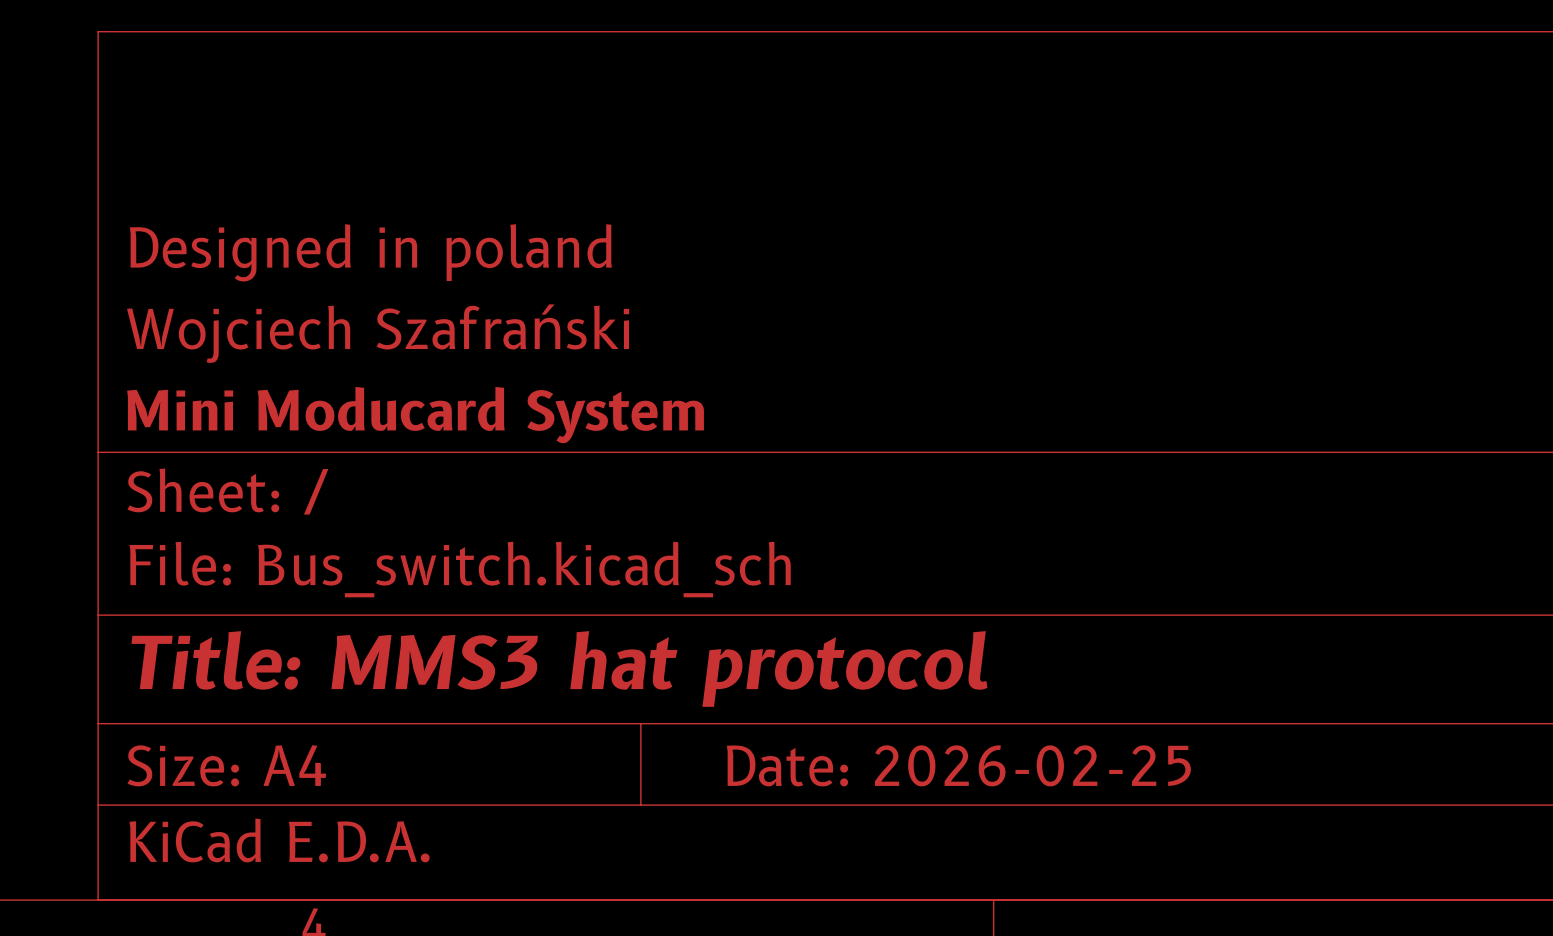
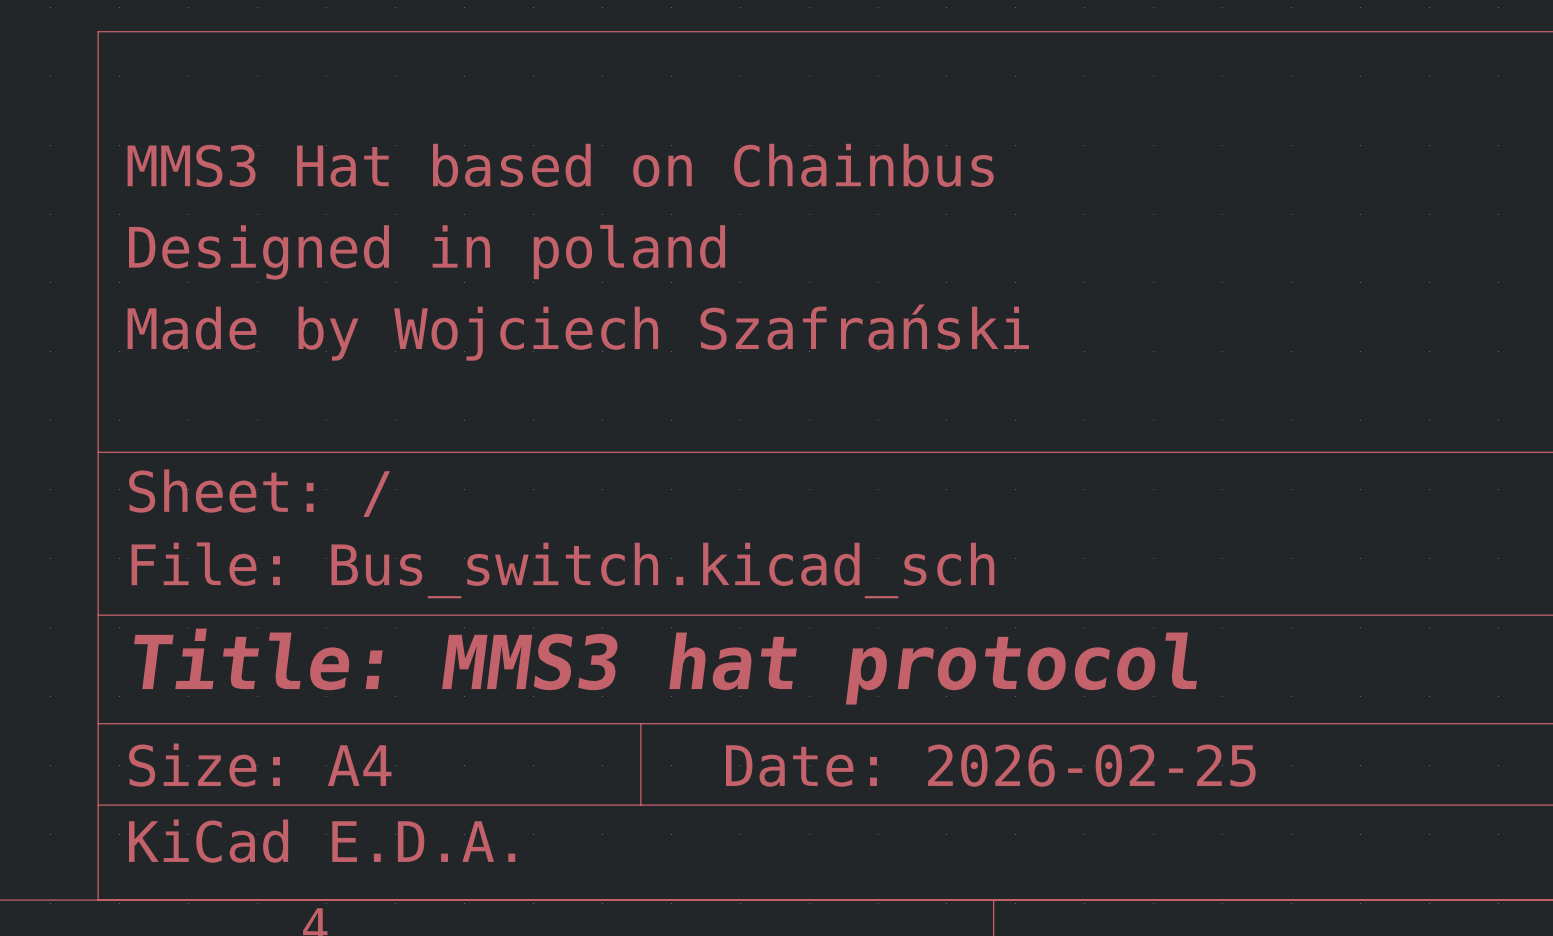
title block: none -> MMS3 Hat based on Chainbus (560, 165)
title block: Wojciech Szafrański (378, 333) -> Made by Wojciech Szafrański (578, 332)
title block: Mini Moducard System (415, 415) -> none

